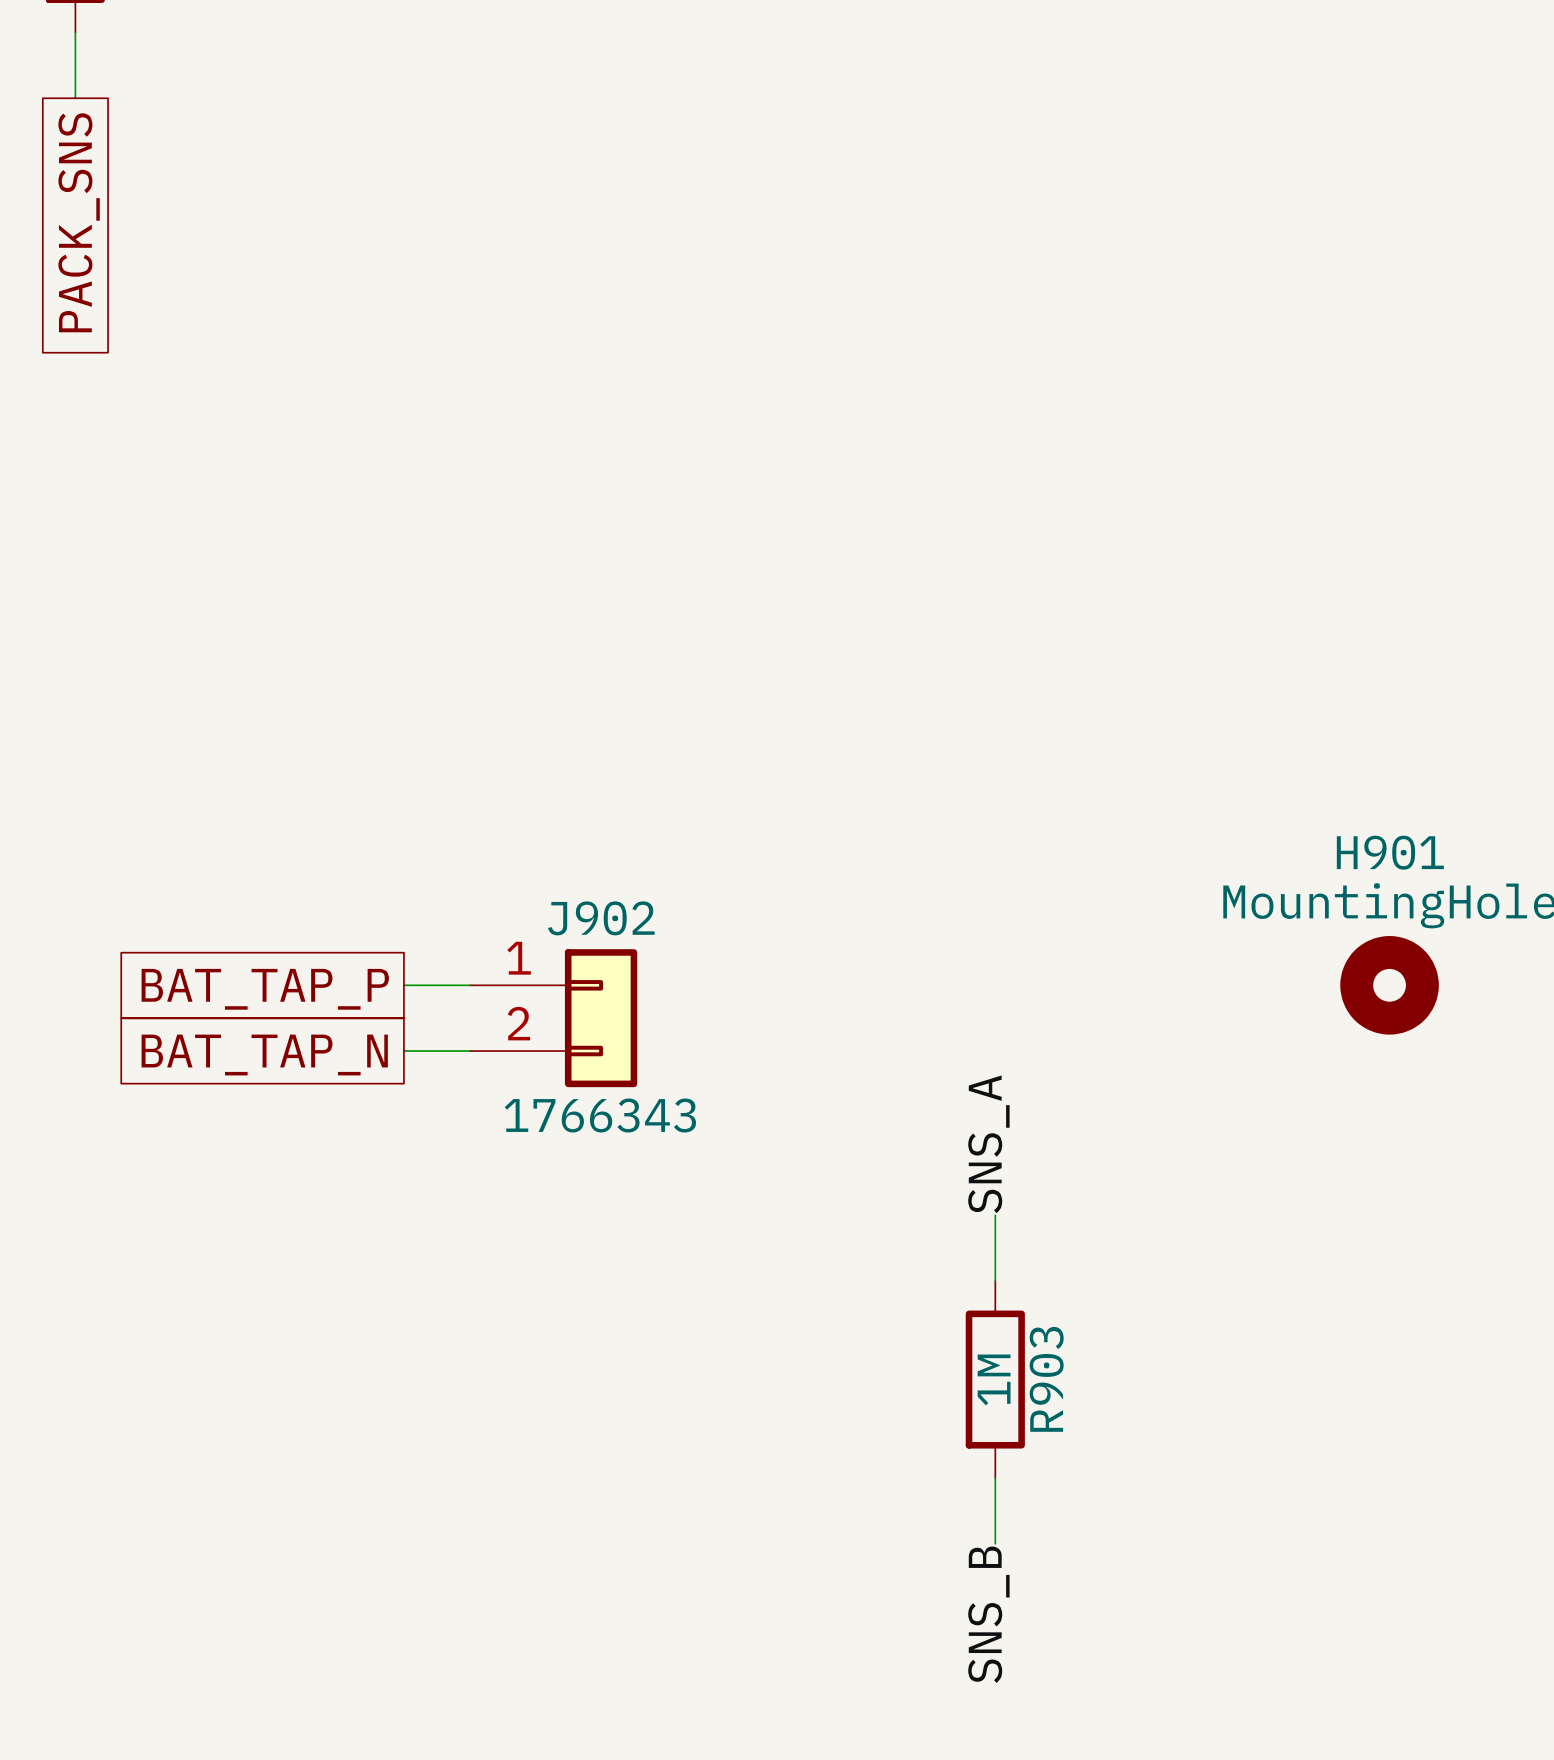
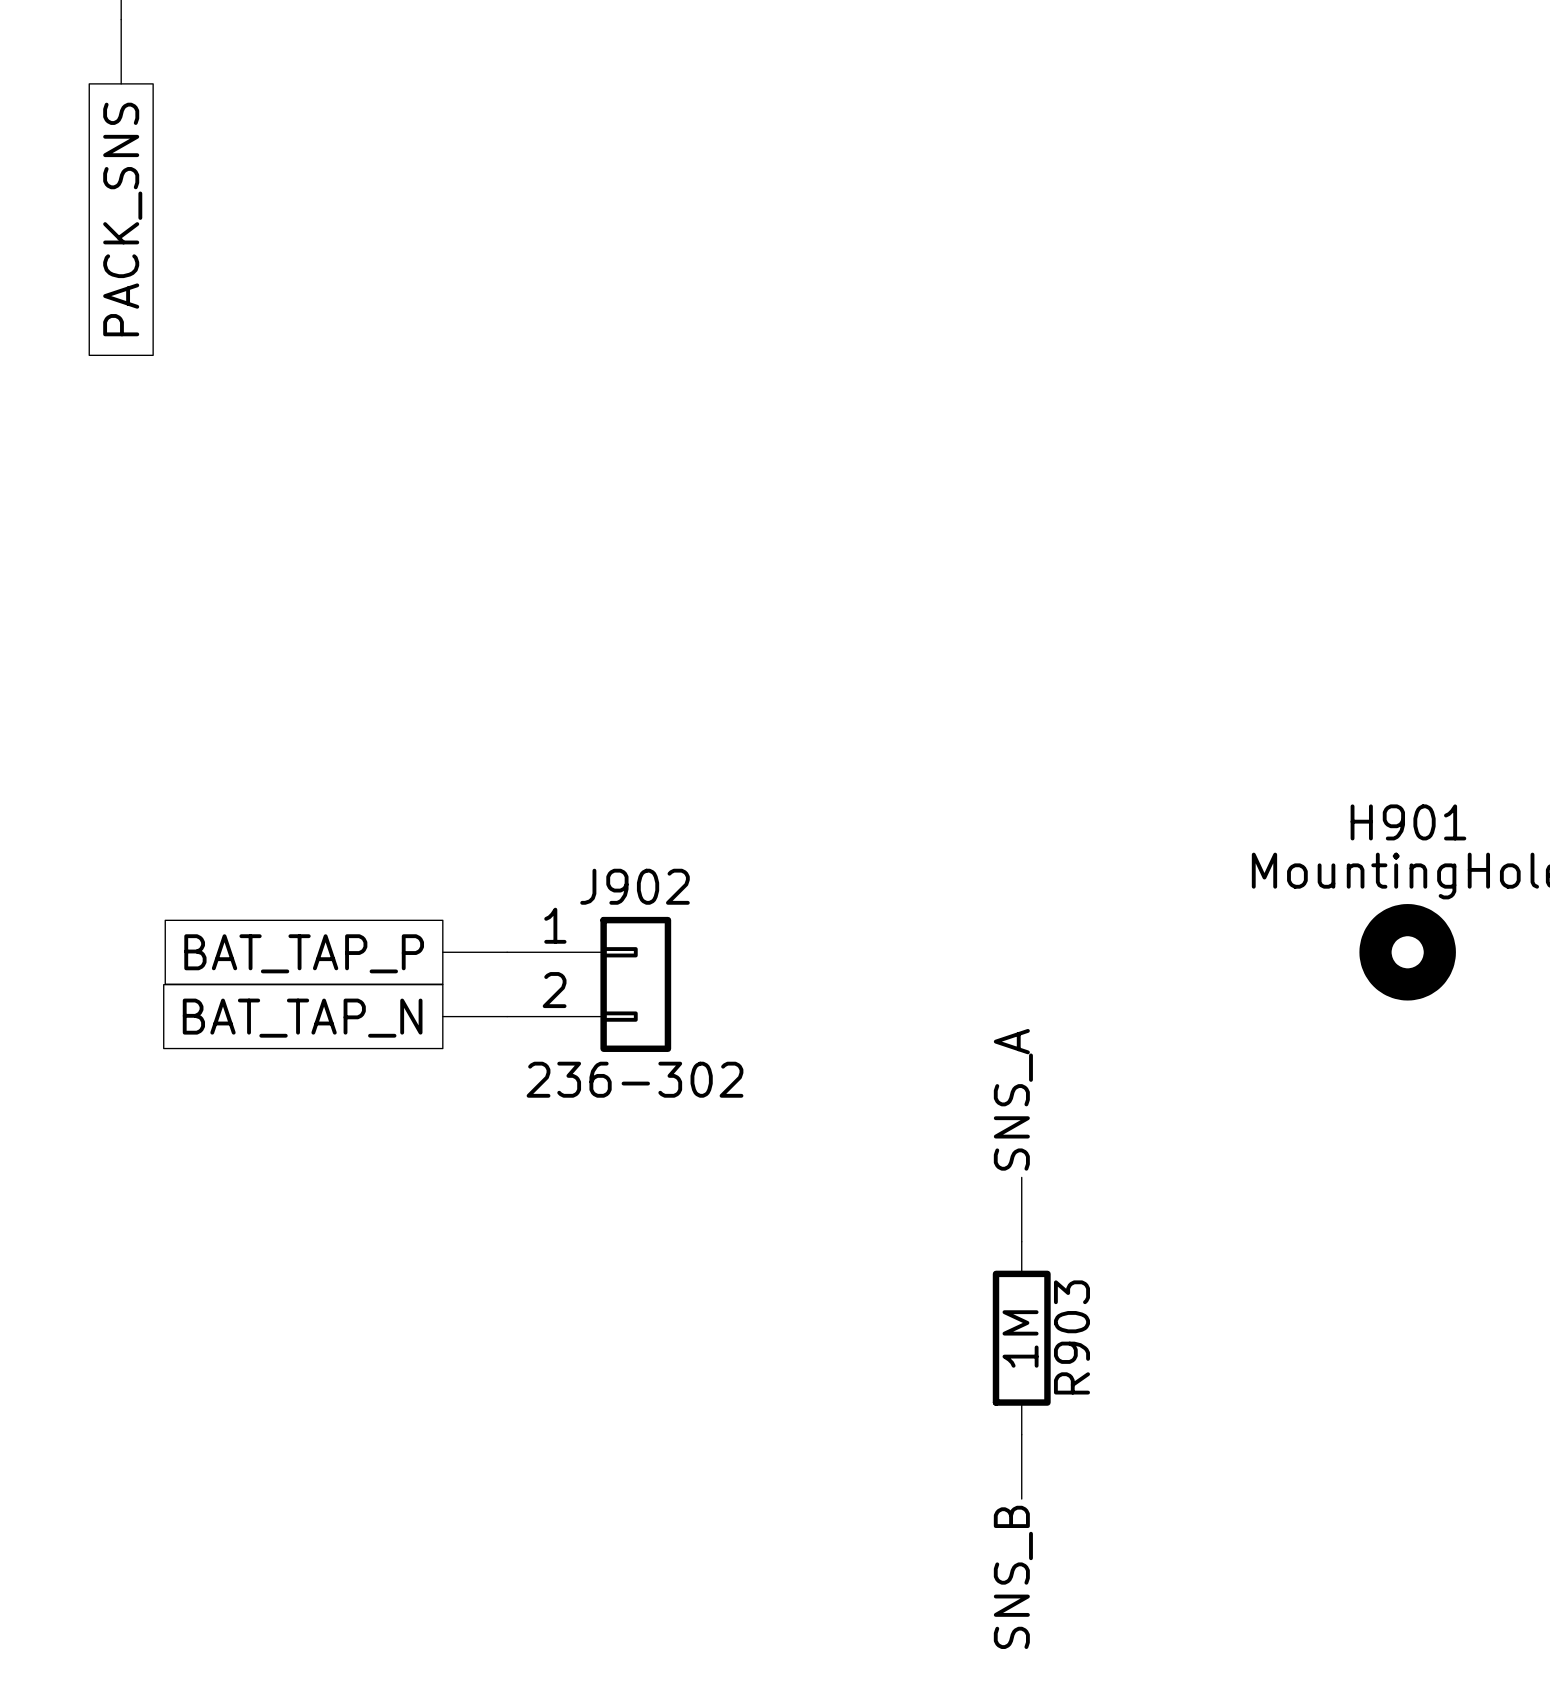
J902 value: 1766343 (600, 1115) -> 236-302 (635, 1079)

